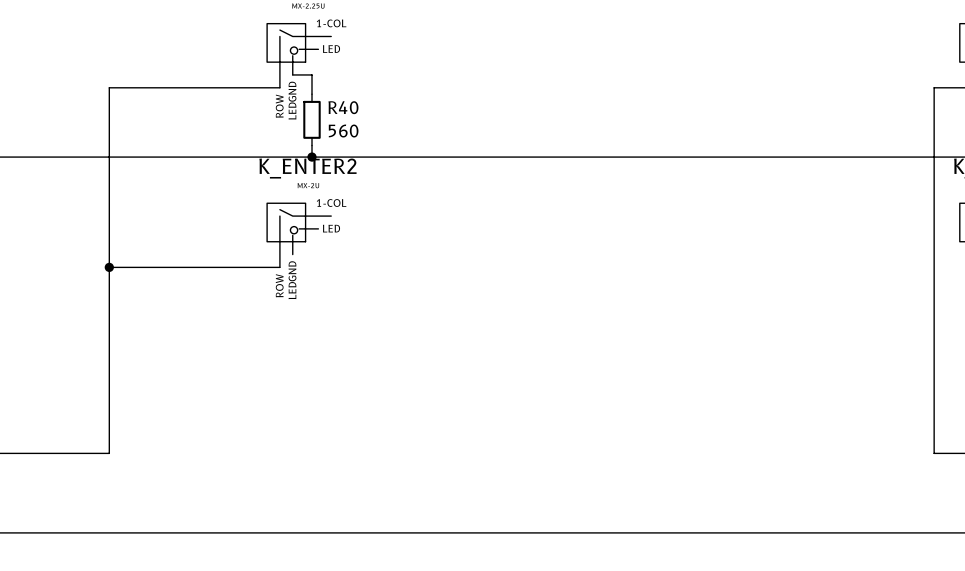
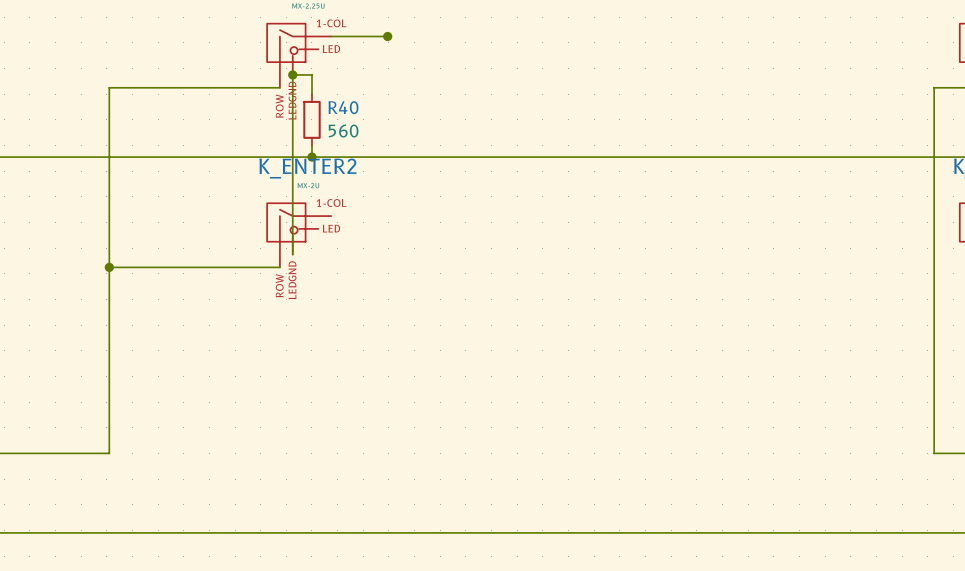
wire: none -> (331, 36) (387, 36)
junction: none -> (387, 36)
wire: none -> (292, 74) (292, 254)
junction: none -> (292, 74)

